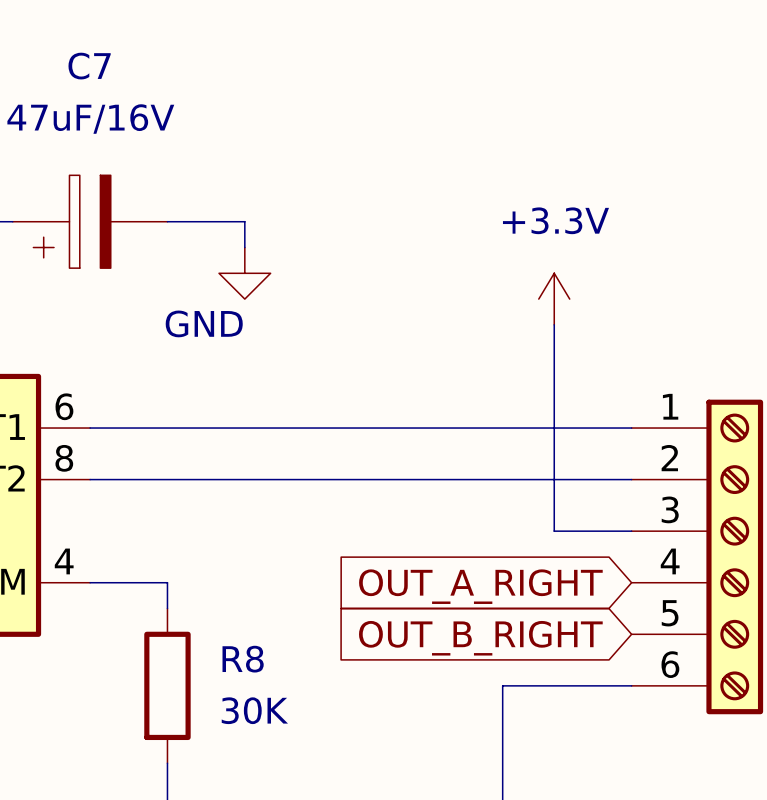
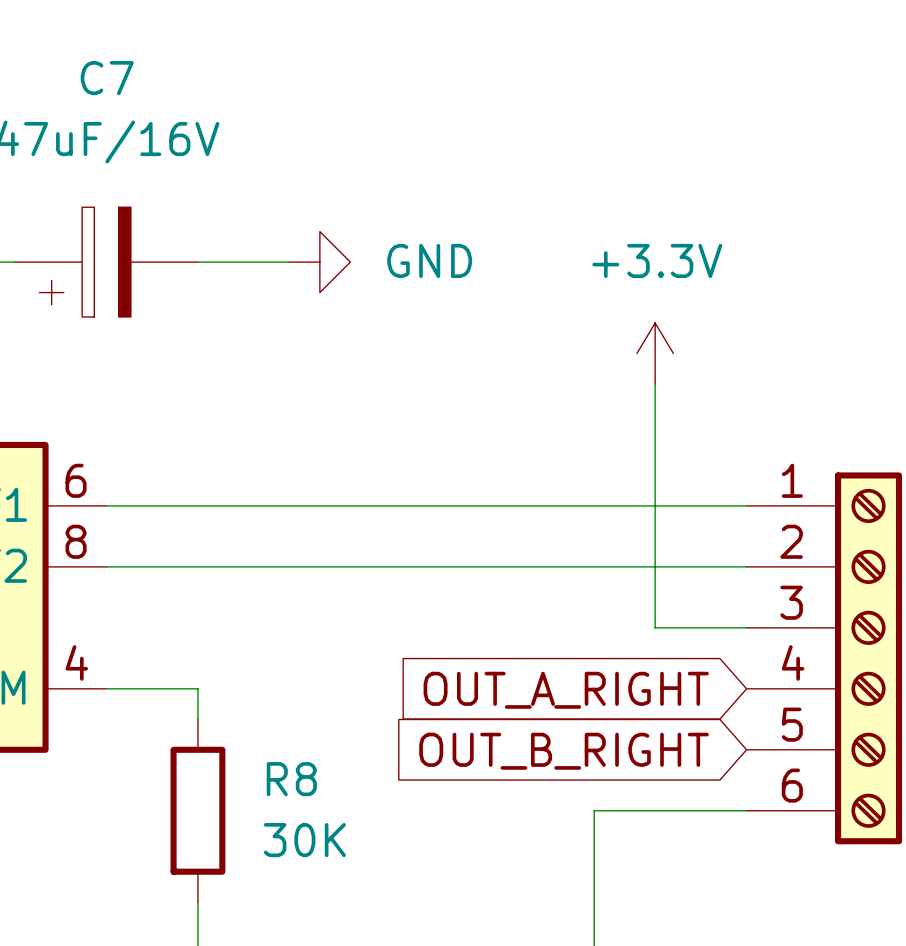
wire: (244, 221) (244, 247) -> none
power symbol rotation: 0° (244, 273) -> 90° counterclockwise (319, 262)
power symbol position: GND (244, 273) -> GND (319, 262)
power symbol text position: GND (204, 323) -> GND (429, 260)

